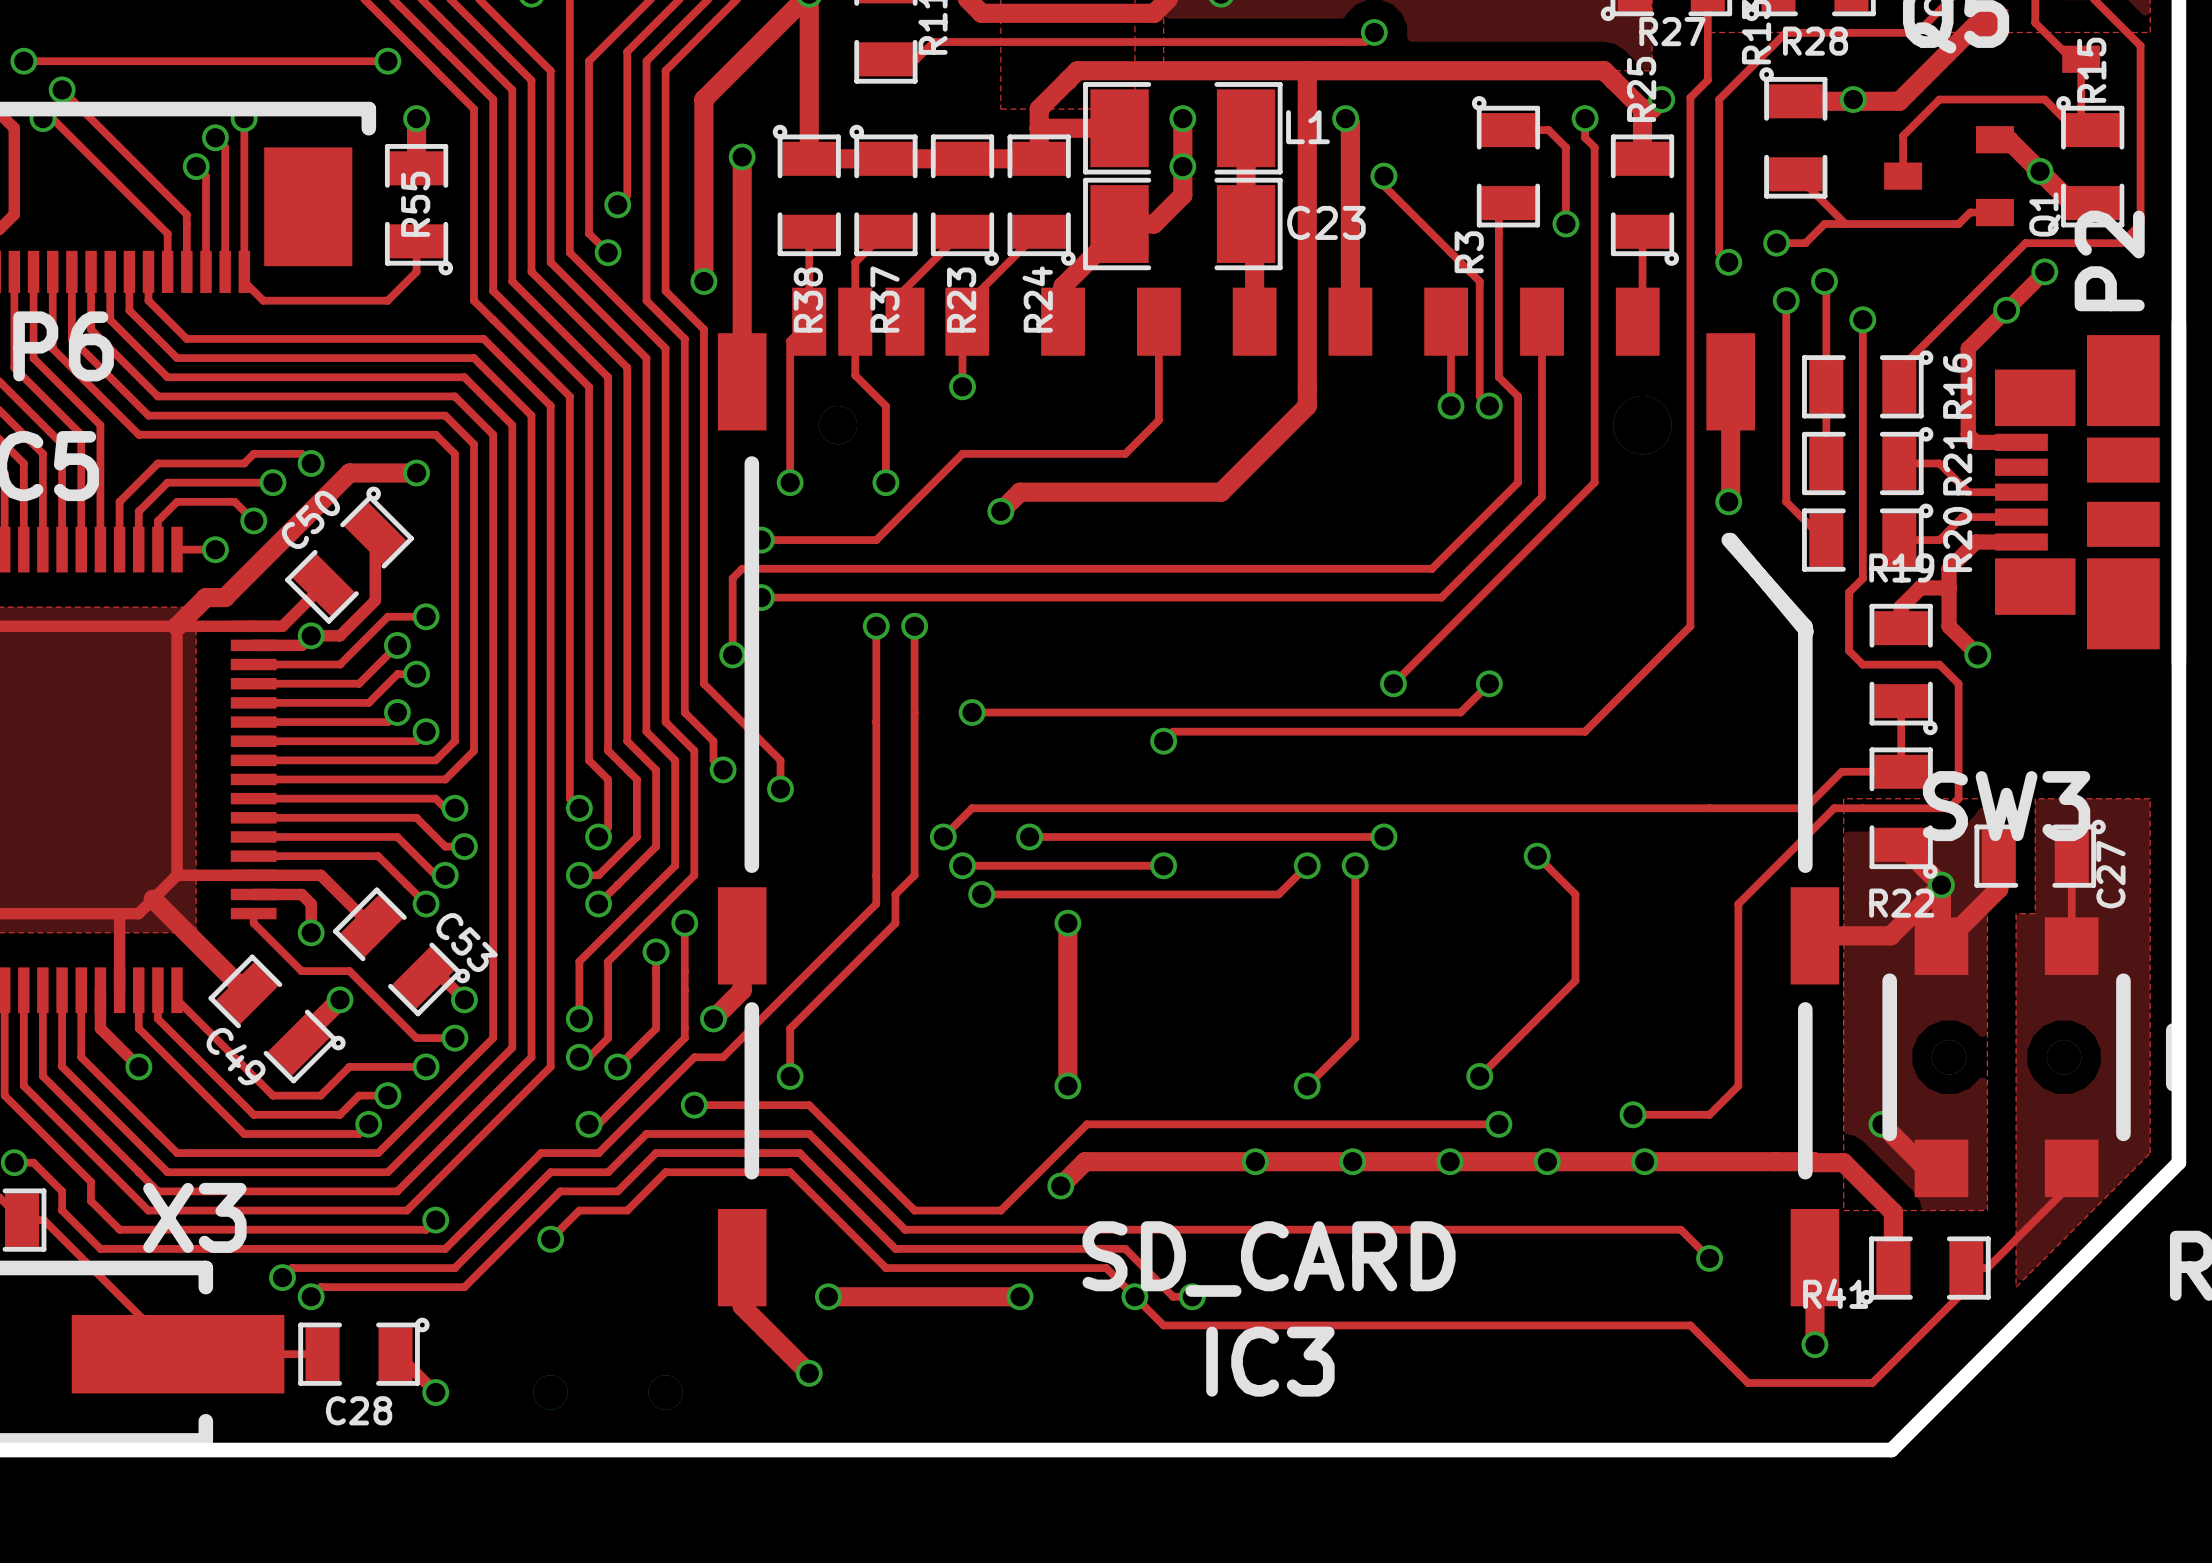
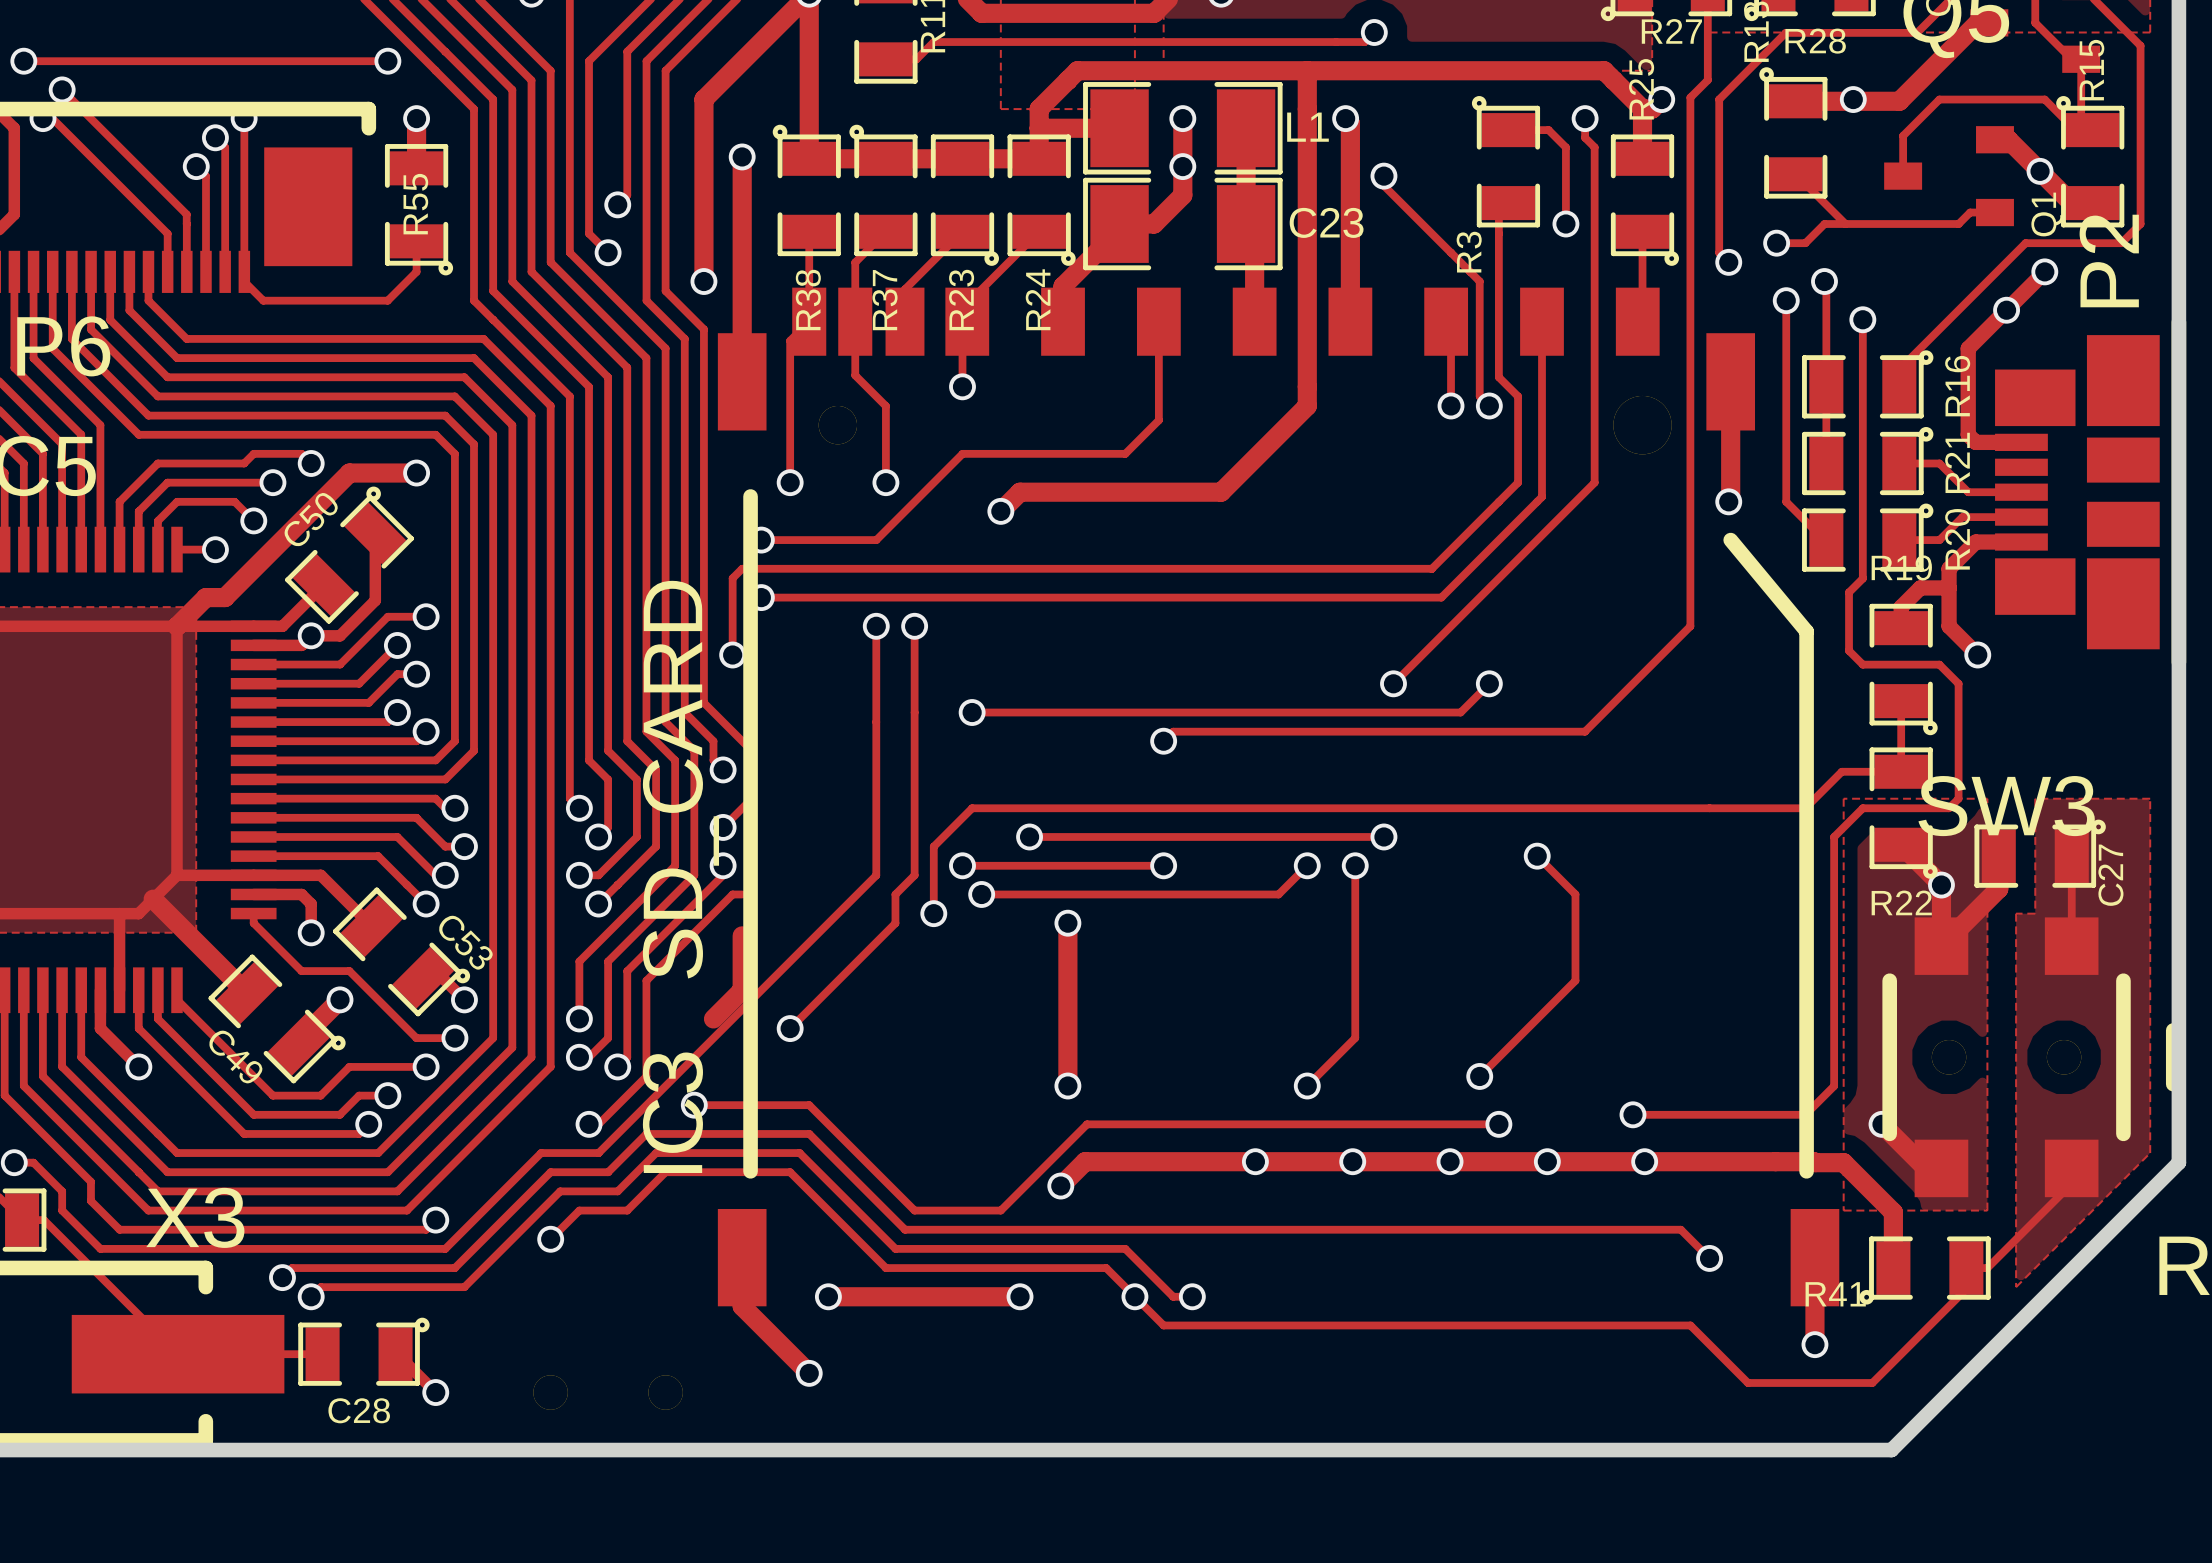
IC3 footprint: [717, 287, 1840, 1307] -> [717, 287, 1840, 1307]
track: (703, 683) (780, 760) (780, 789) -> (703, 683) (703, 702) (751, 750) (751, 798) (723, 827)
via: (780, 789) -> none
track: (1862, 808) (1834, 808) (1738, 904) (1738, 1086) (1709, 1114) -> (1862, 808) (1834, 836) (1834, 1086) (1805, 1114) (1709, 1114)
via: none -> (723, 827)
via position: (943, 836) -> (933, 913)
track: none -> (943, 837) (933, 846) (933, 913)
via: none -> (723, 865)
track: (876, 875) (876, 904) (723, 1057) (694, 1057) -> (876, 875) (694, 1057)
track: (1941, 885) (1890, 935) (1814, 935) -> none
track: (684, 923) (684, 1038) (646, 1076) -> (742, 894) (732, 894) (646, 980) (646, 1076)
via: (684, 923) -> none
track: (656, 951) (656, 1028) (627, 1057) -> (723, 865) (723, 875) (627, 971) (627, 1057)
via: (656, 951) -> none
via: (713, 1018) -> none
track: (790, 1028) (790, 1076) -> none
via: none -> (790, 1028)
via: (790, 1076) -> none
IC3 value position: SD_CARD (1269, 1259) -> SD_CARD (680, 779)
IC3 name position: IC3 (1270, 1361) -> IC3 (672, 1112)

